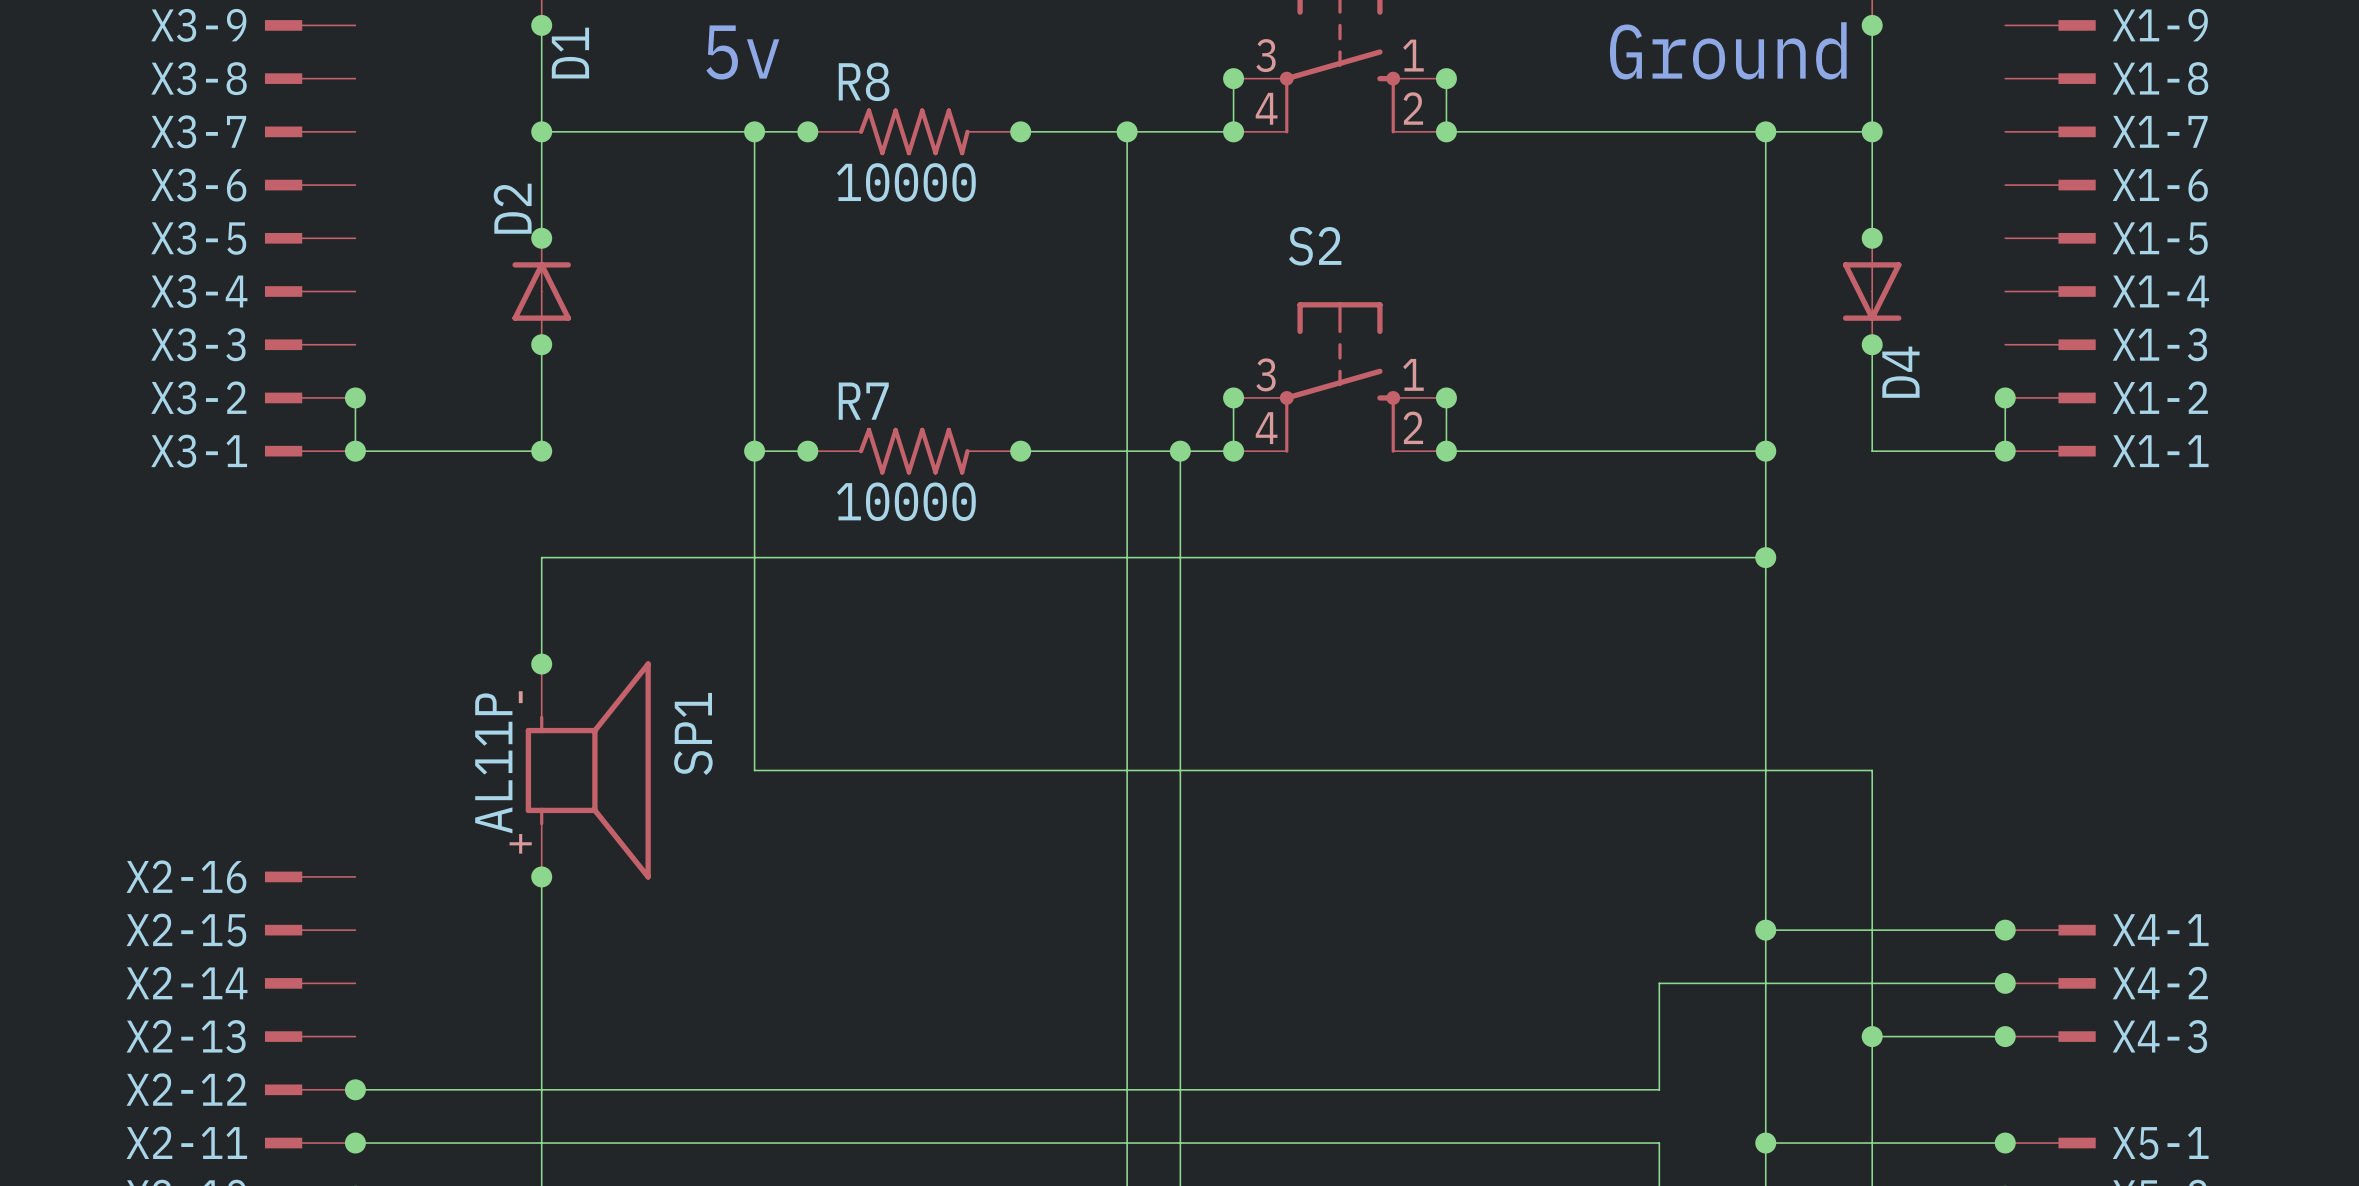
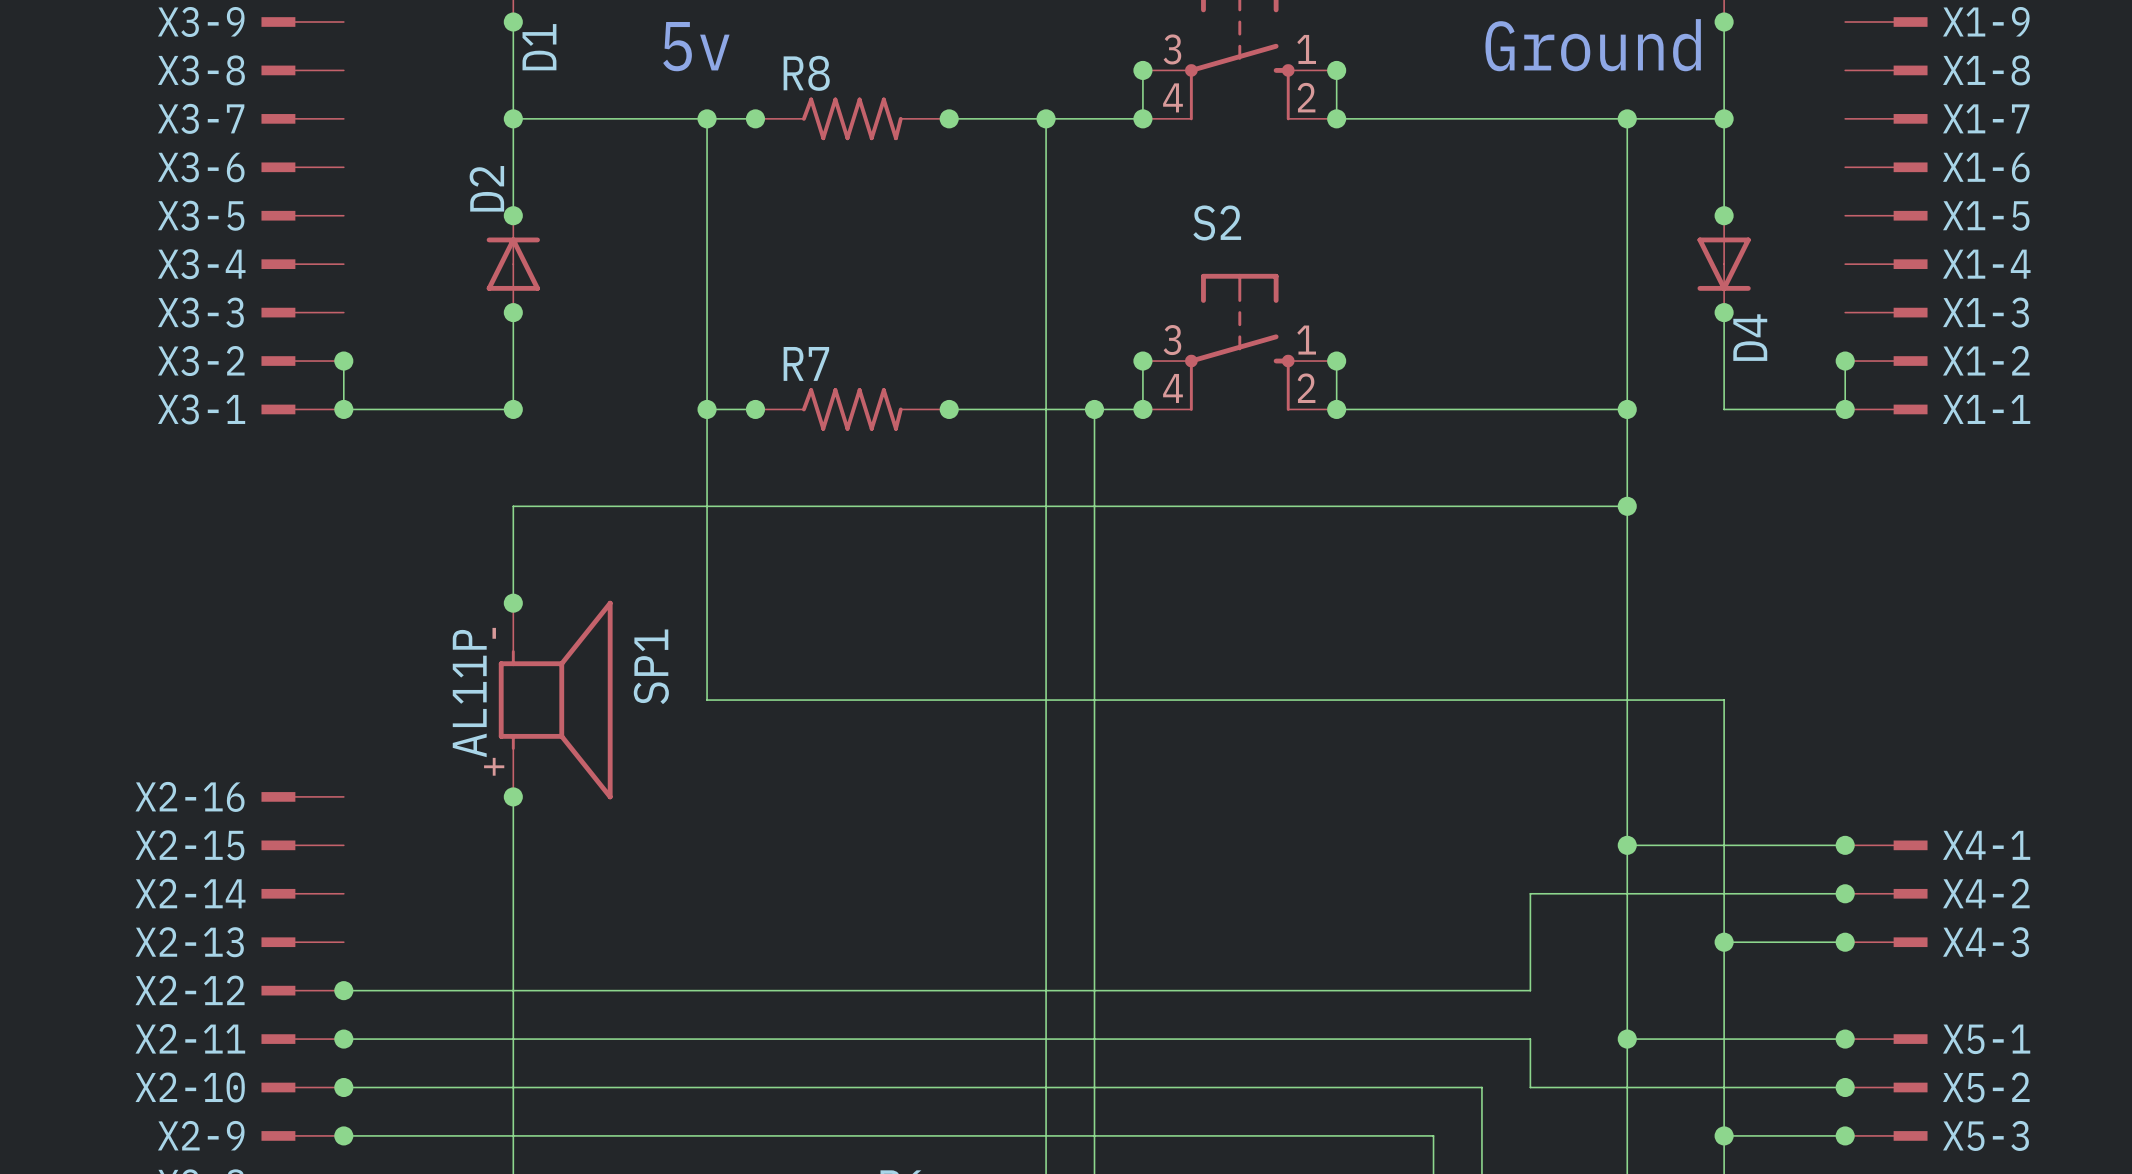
R8 value: 10000 (906, 182) -> none
R7 value: 10000 (906, 501) -> none

